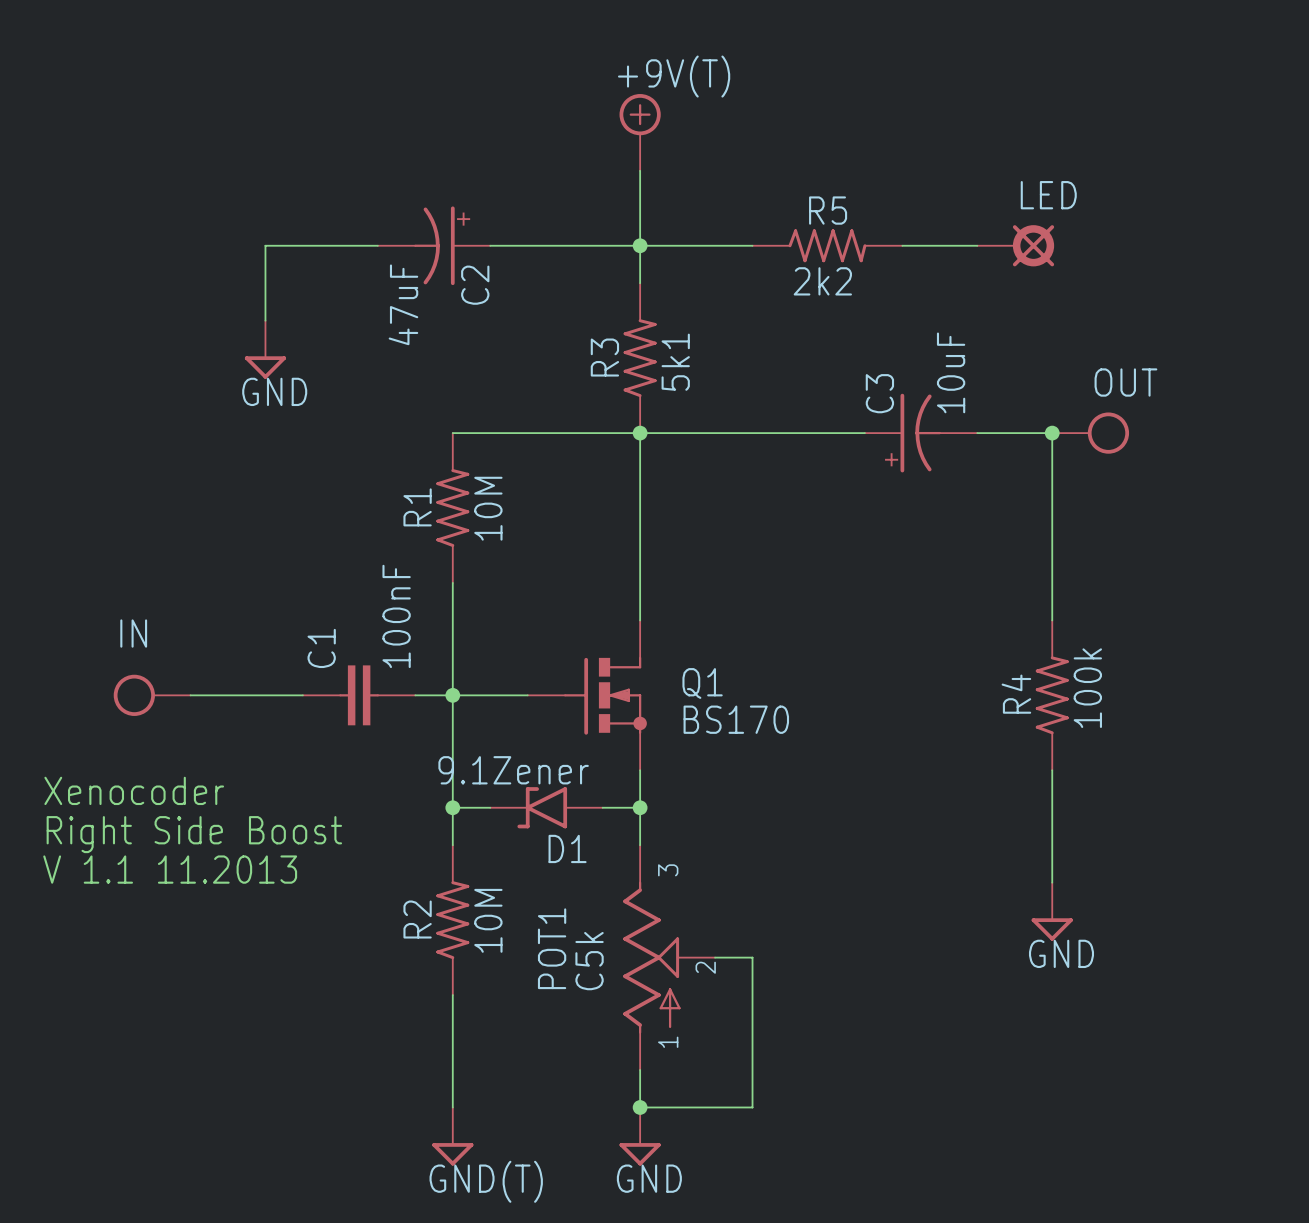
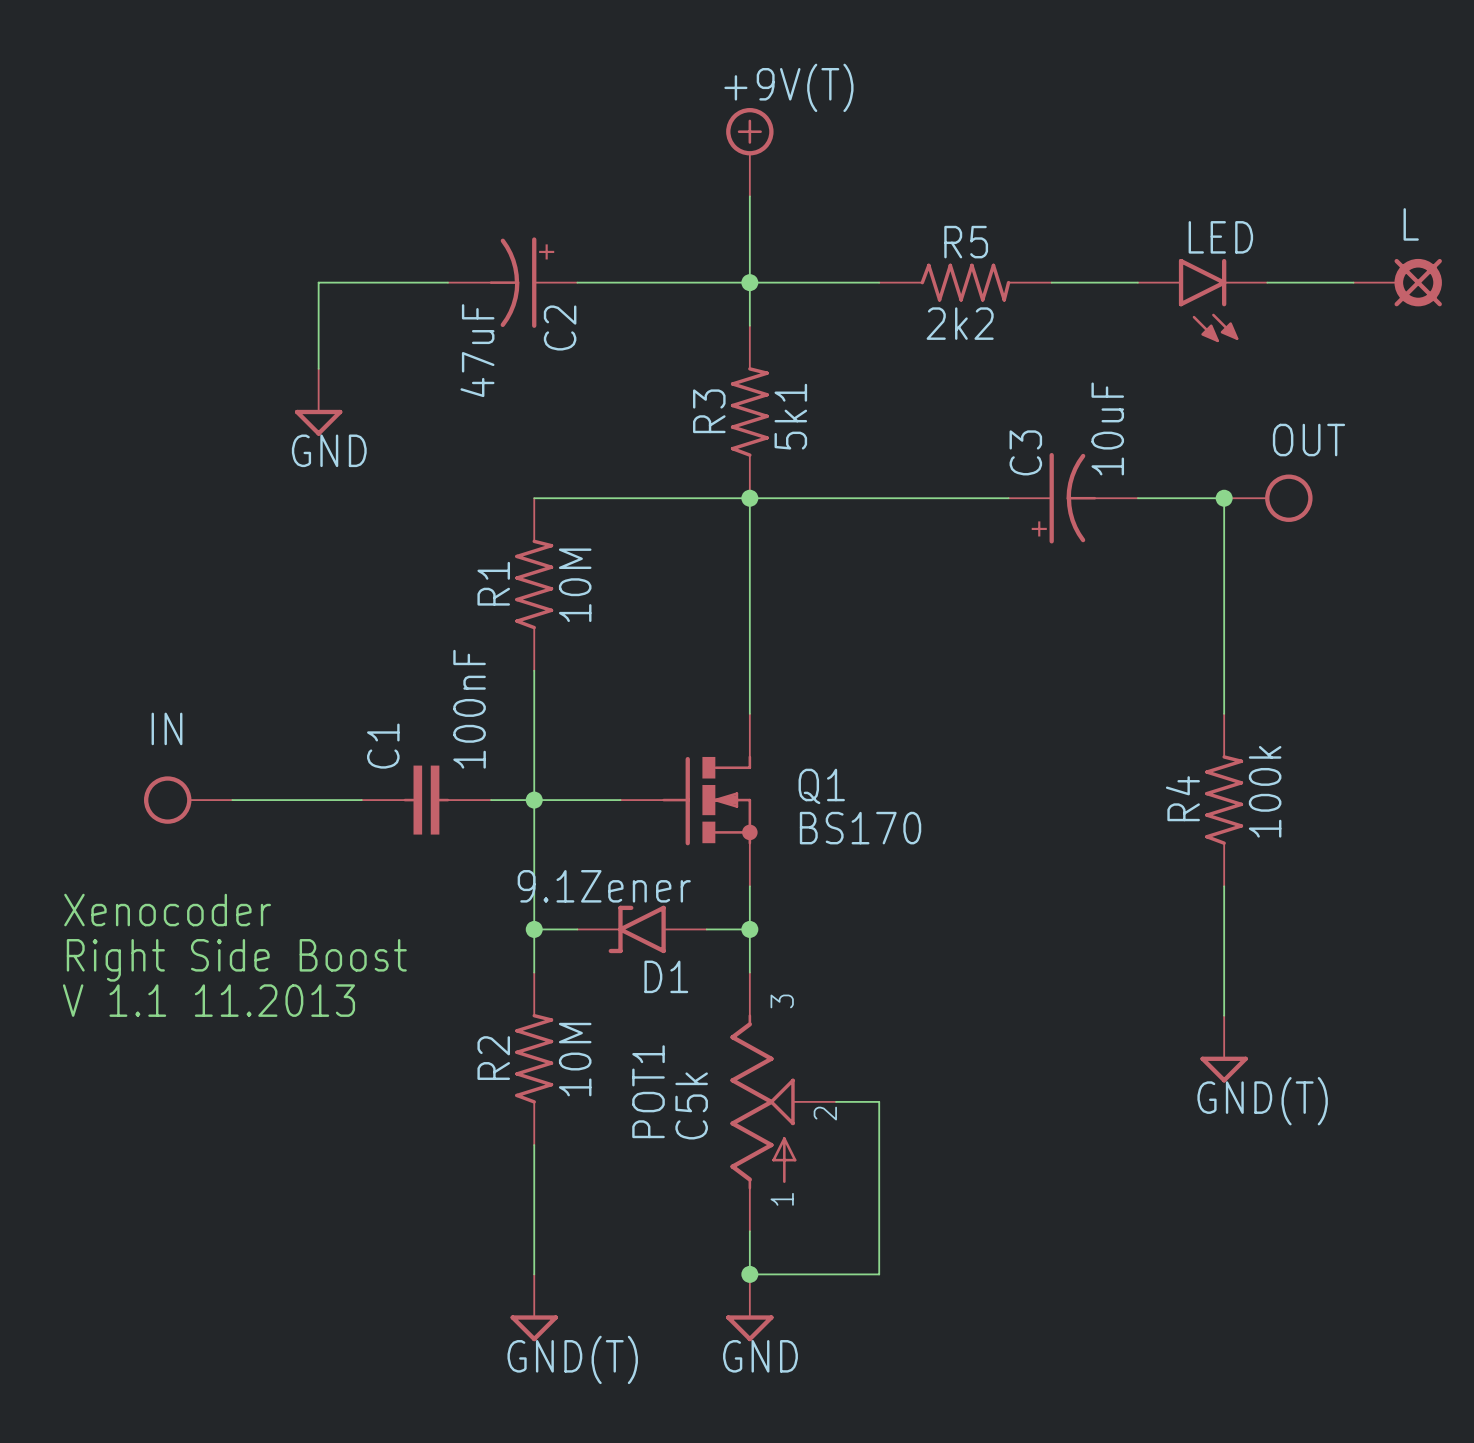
LED: (1015, 245) -> none
wire: none -> (1267, 282) (1353, 282)
L: none -> (1397, 282)
LED: none -> (1202, 300)
part: none -> GND(T) (1224, 1049)

